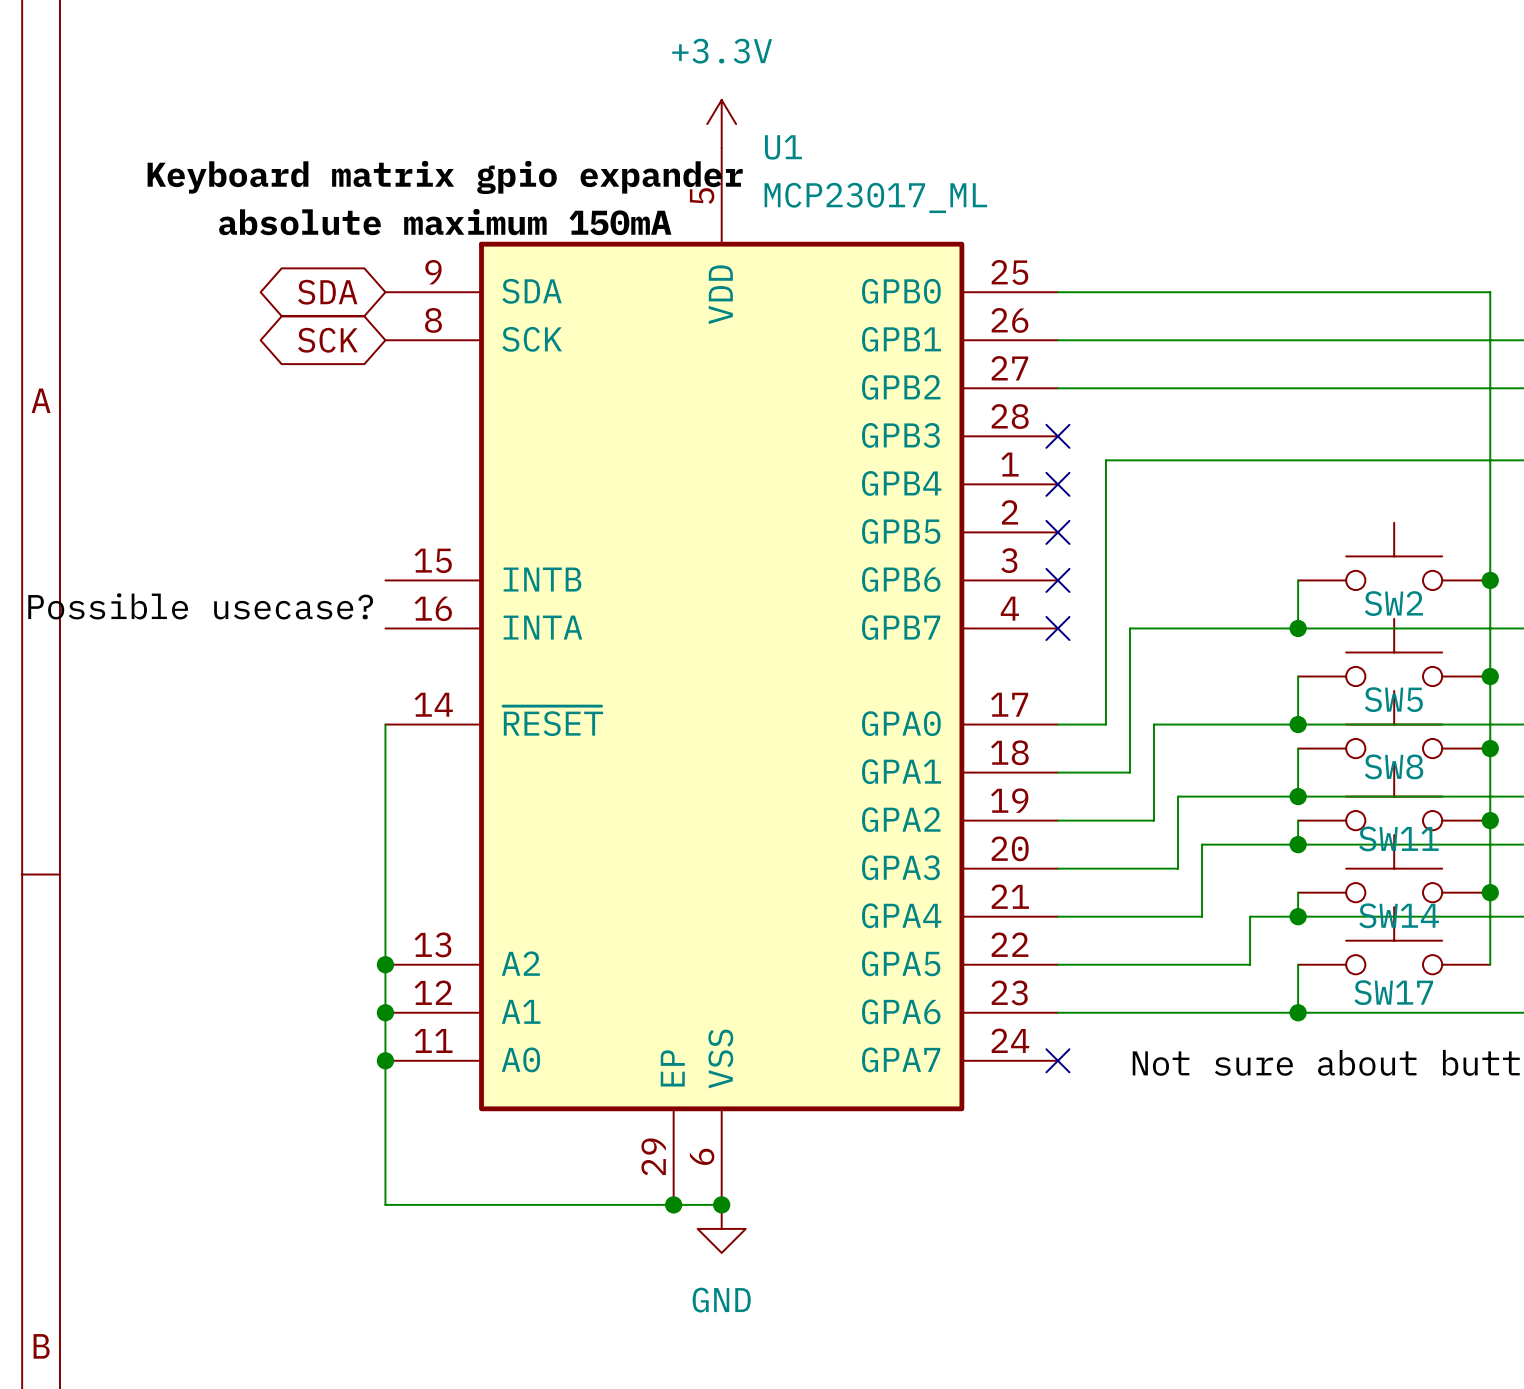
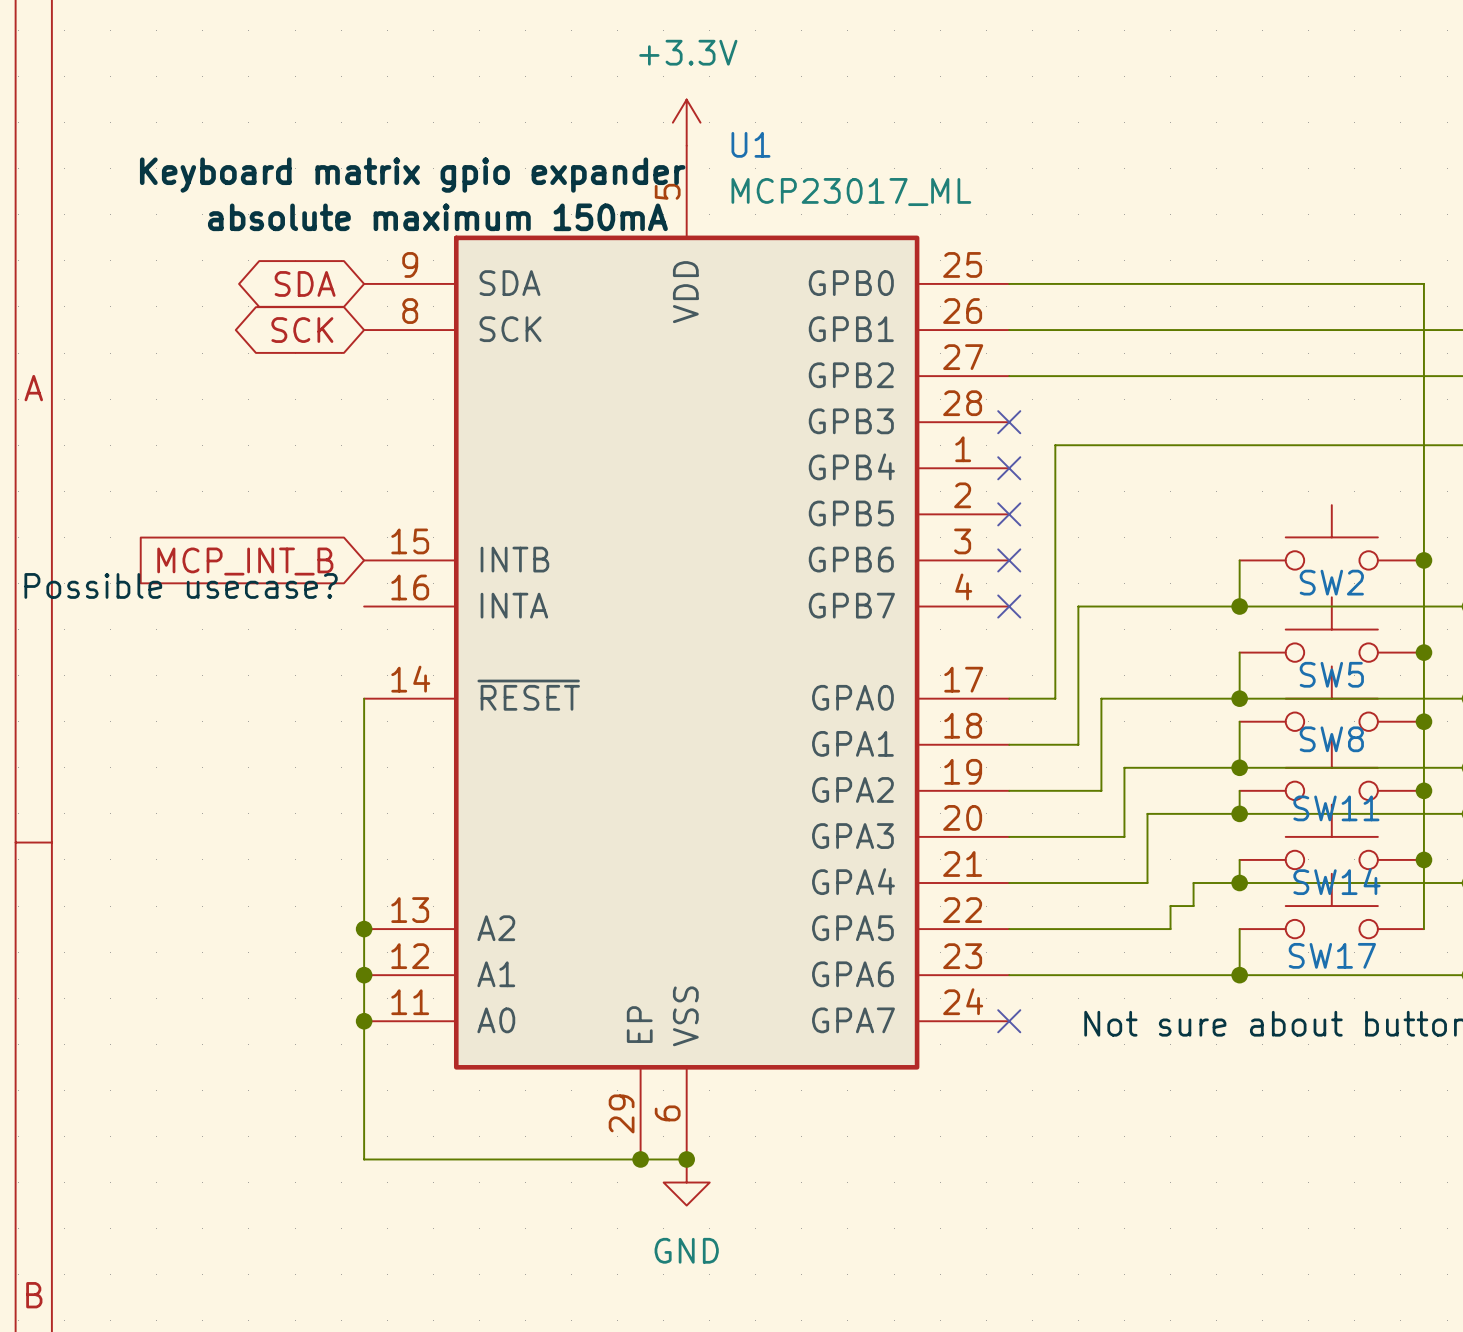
global label: none -> MCP_INT_B (245, 561)
wire: (1250, 940) (1250, 964) (1226, 964) -> (1193, 906) (1170, 906) (1170, 929)

